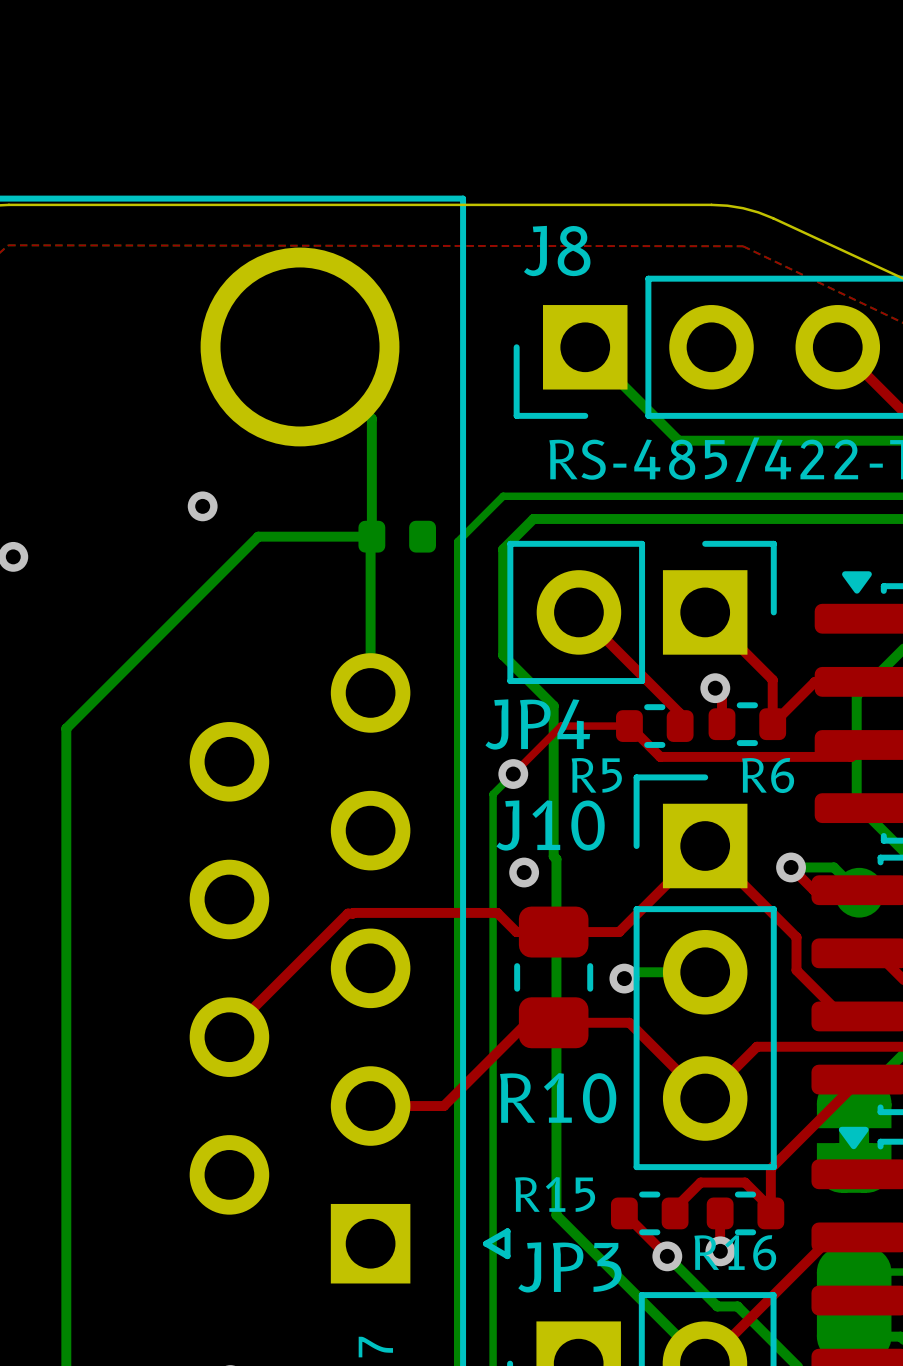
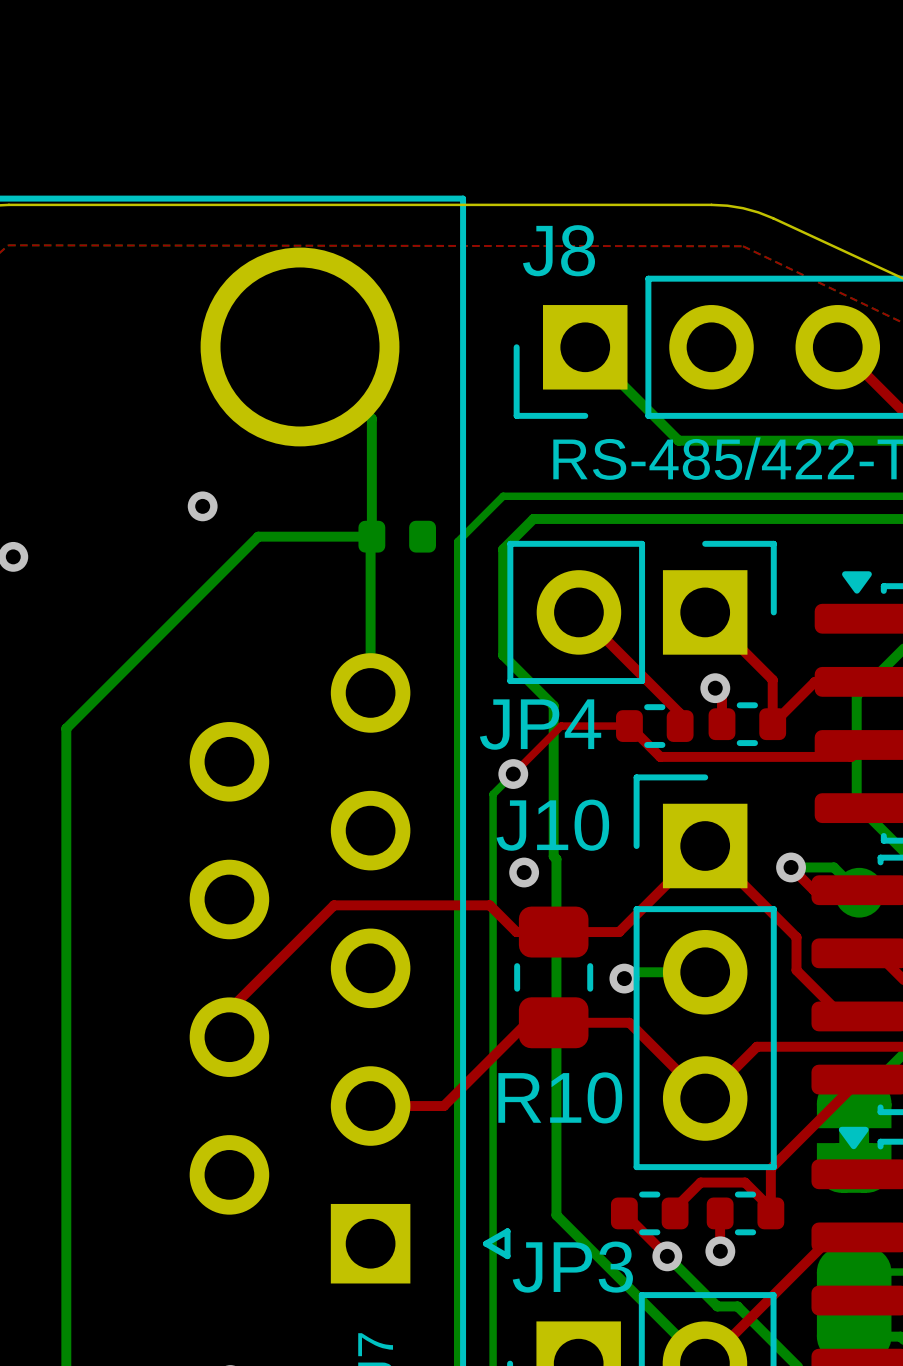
R5 name: R5 (596, 775) -> none
R6 name: R6 (768, 775) -> none
top track: (353, 912) (497, 912) -> (229, 1009) (333, 905) (489, 905) (497, 912)
top track: (353, 913) (347, 913) (229, 1032) (229, 1037) -> none
R15 name: R15 (555, 1194) -> none
R16 name: R16 (735, 1252) -> none

